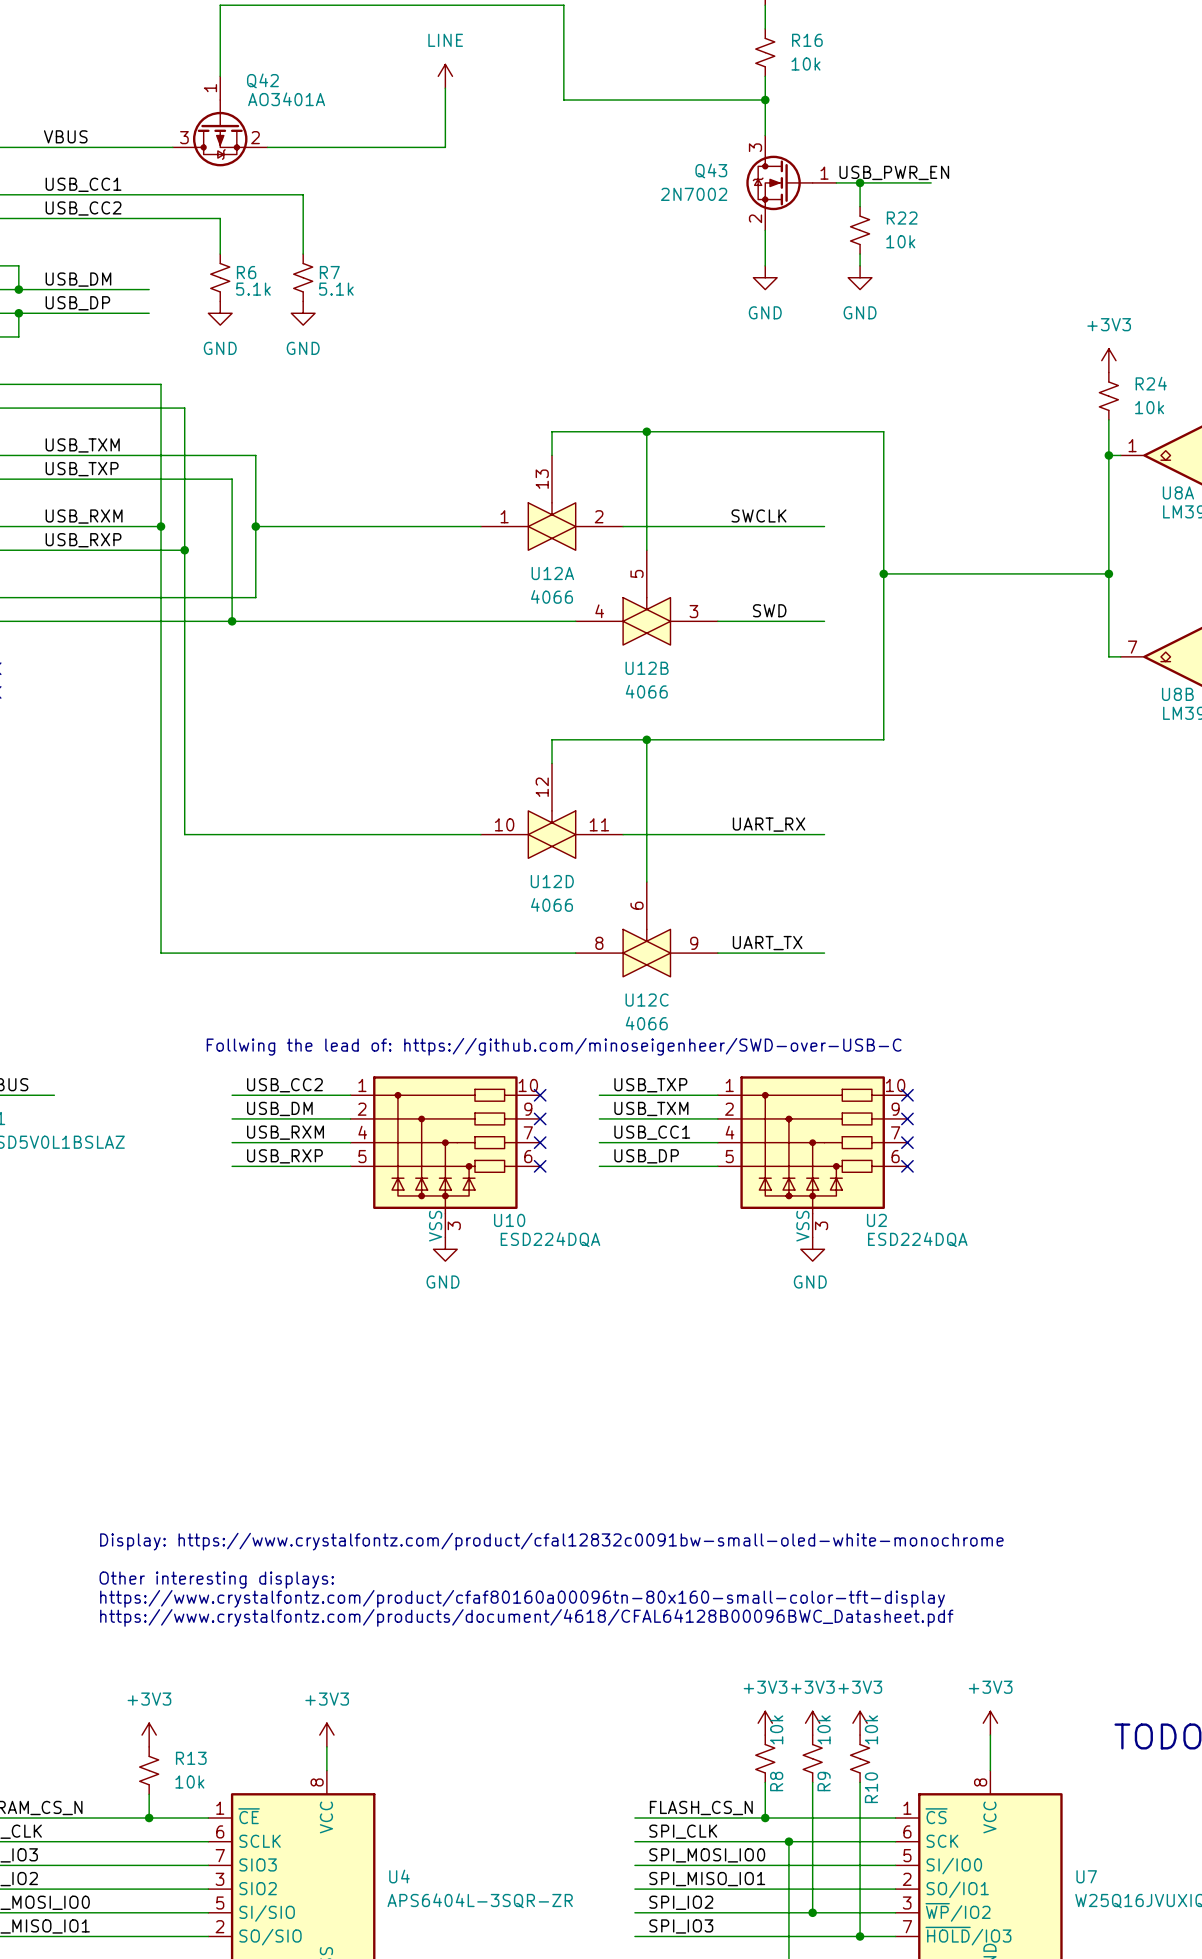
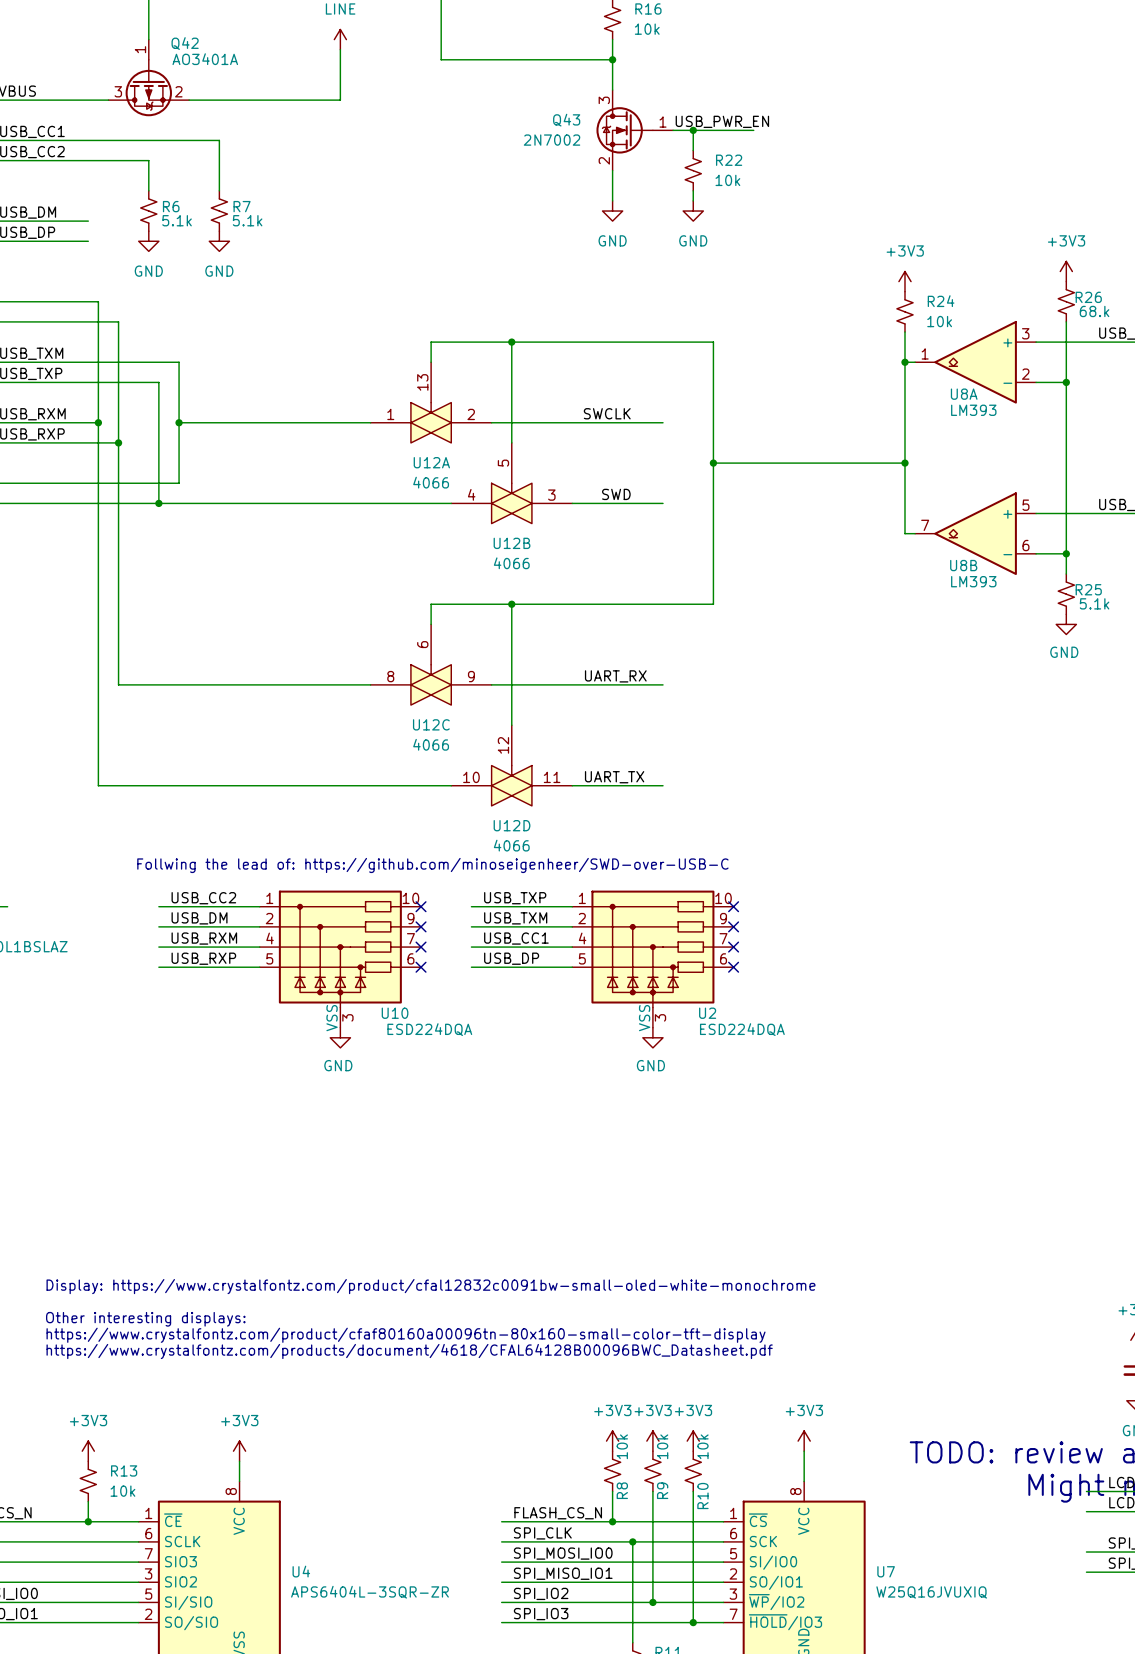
U12D position: (552, 810) -> (511, 765)
U12C position: (646, 929) -> (431, 664)

